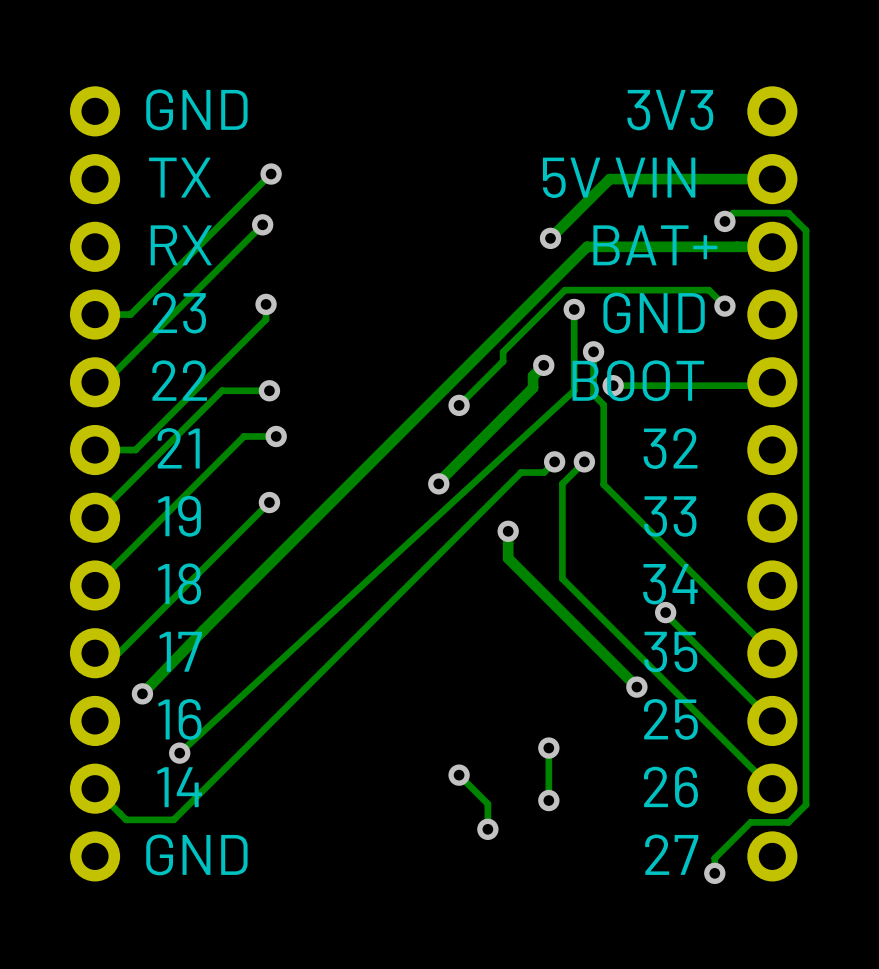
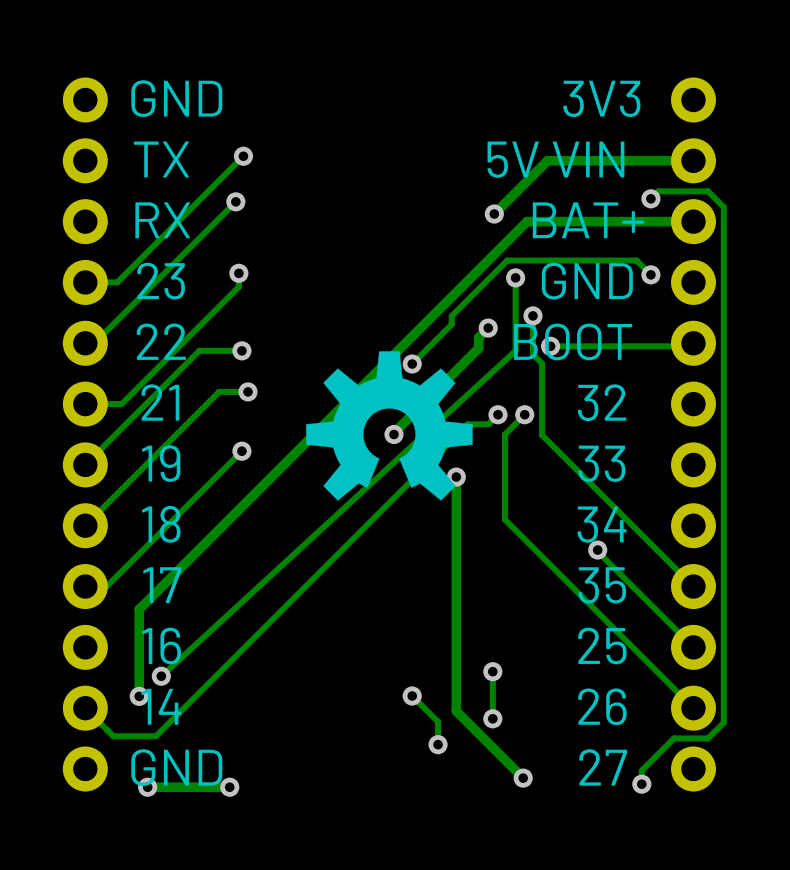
drawing: none -> [306, 351, 473, 501]
track: (508, 558) (636, 687) -> (456, 501) (456, 711) (523, 778)
track: (203, 630) (142, 693) -> (182, 566) (139, 609) (139, 696)
via: (636, 687) -> none
via position: (142, 693) -> (139, 696)
via: none -> (523, 778)
via: none -> (147, 787)
track: none -> (229, 787) (147, 787)
via: none -> (229, 787)

